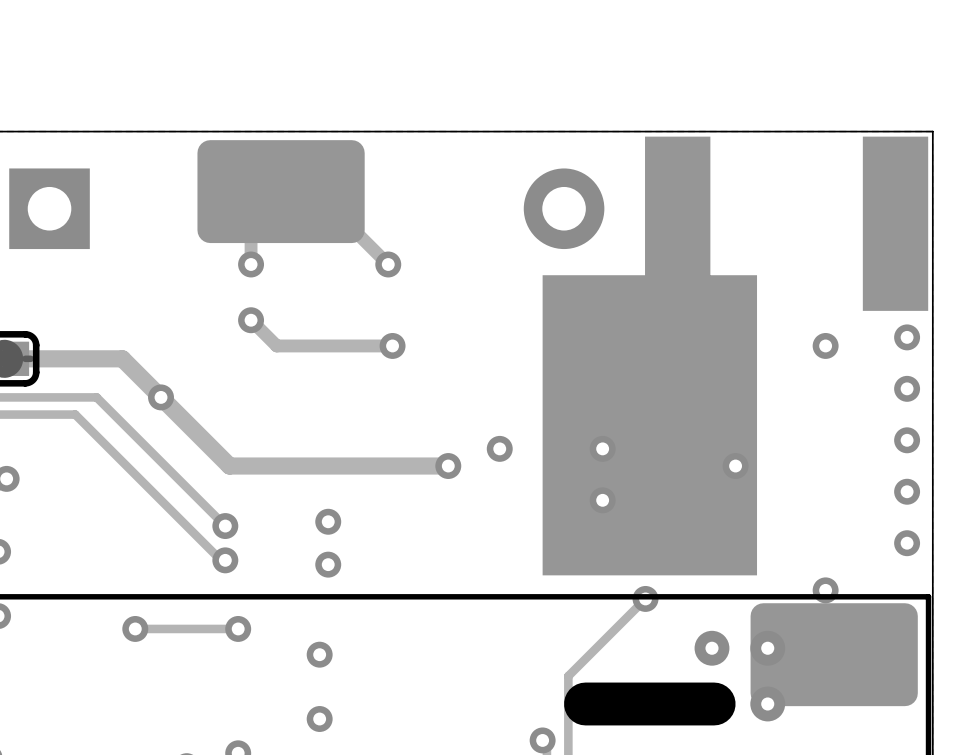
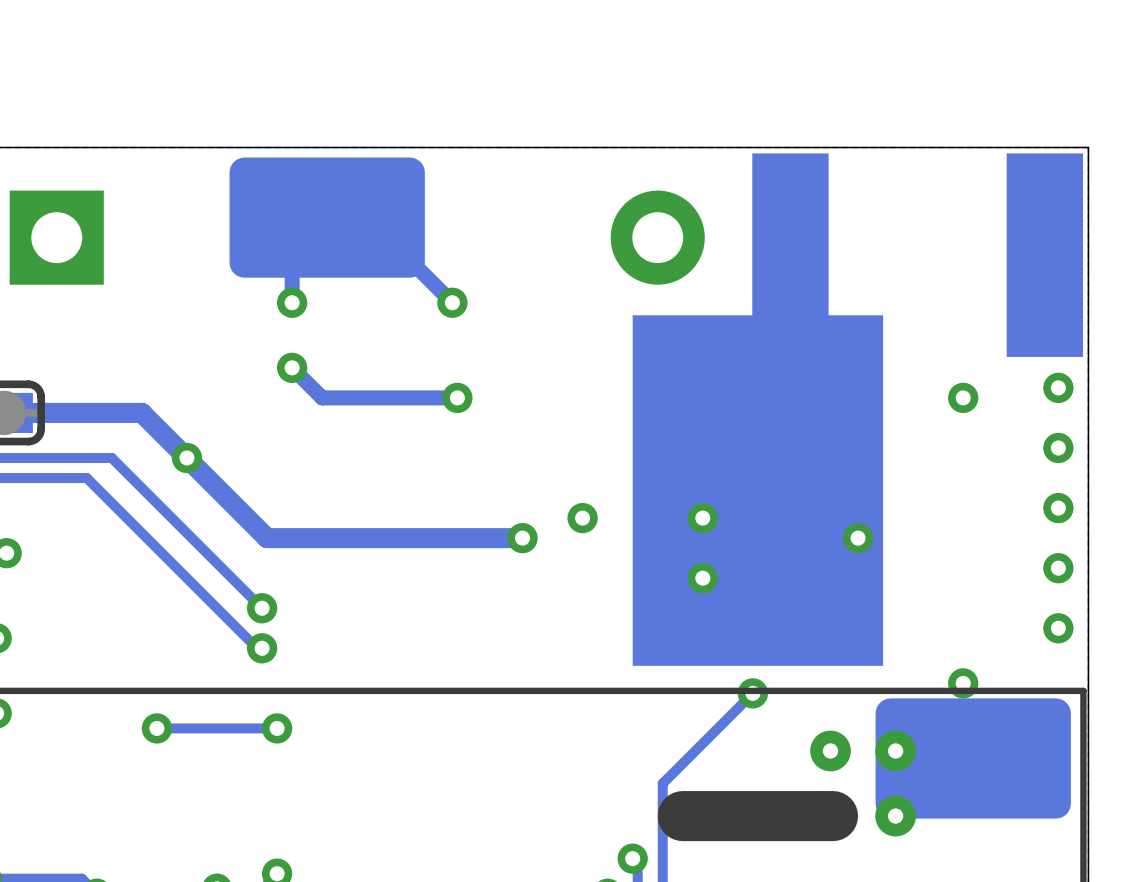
via: (328, 521) -> none
via: (328, 564) -> none
via: (319, 654) -> none
via: (319, 719) -> none

